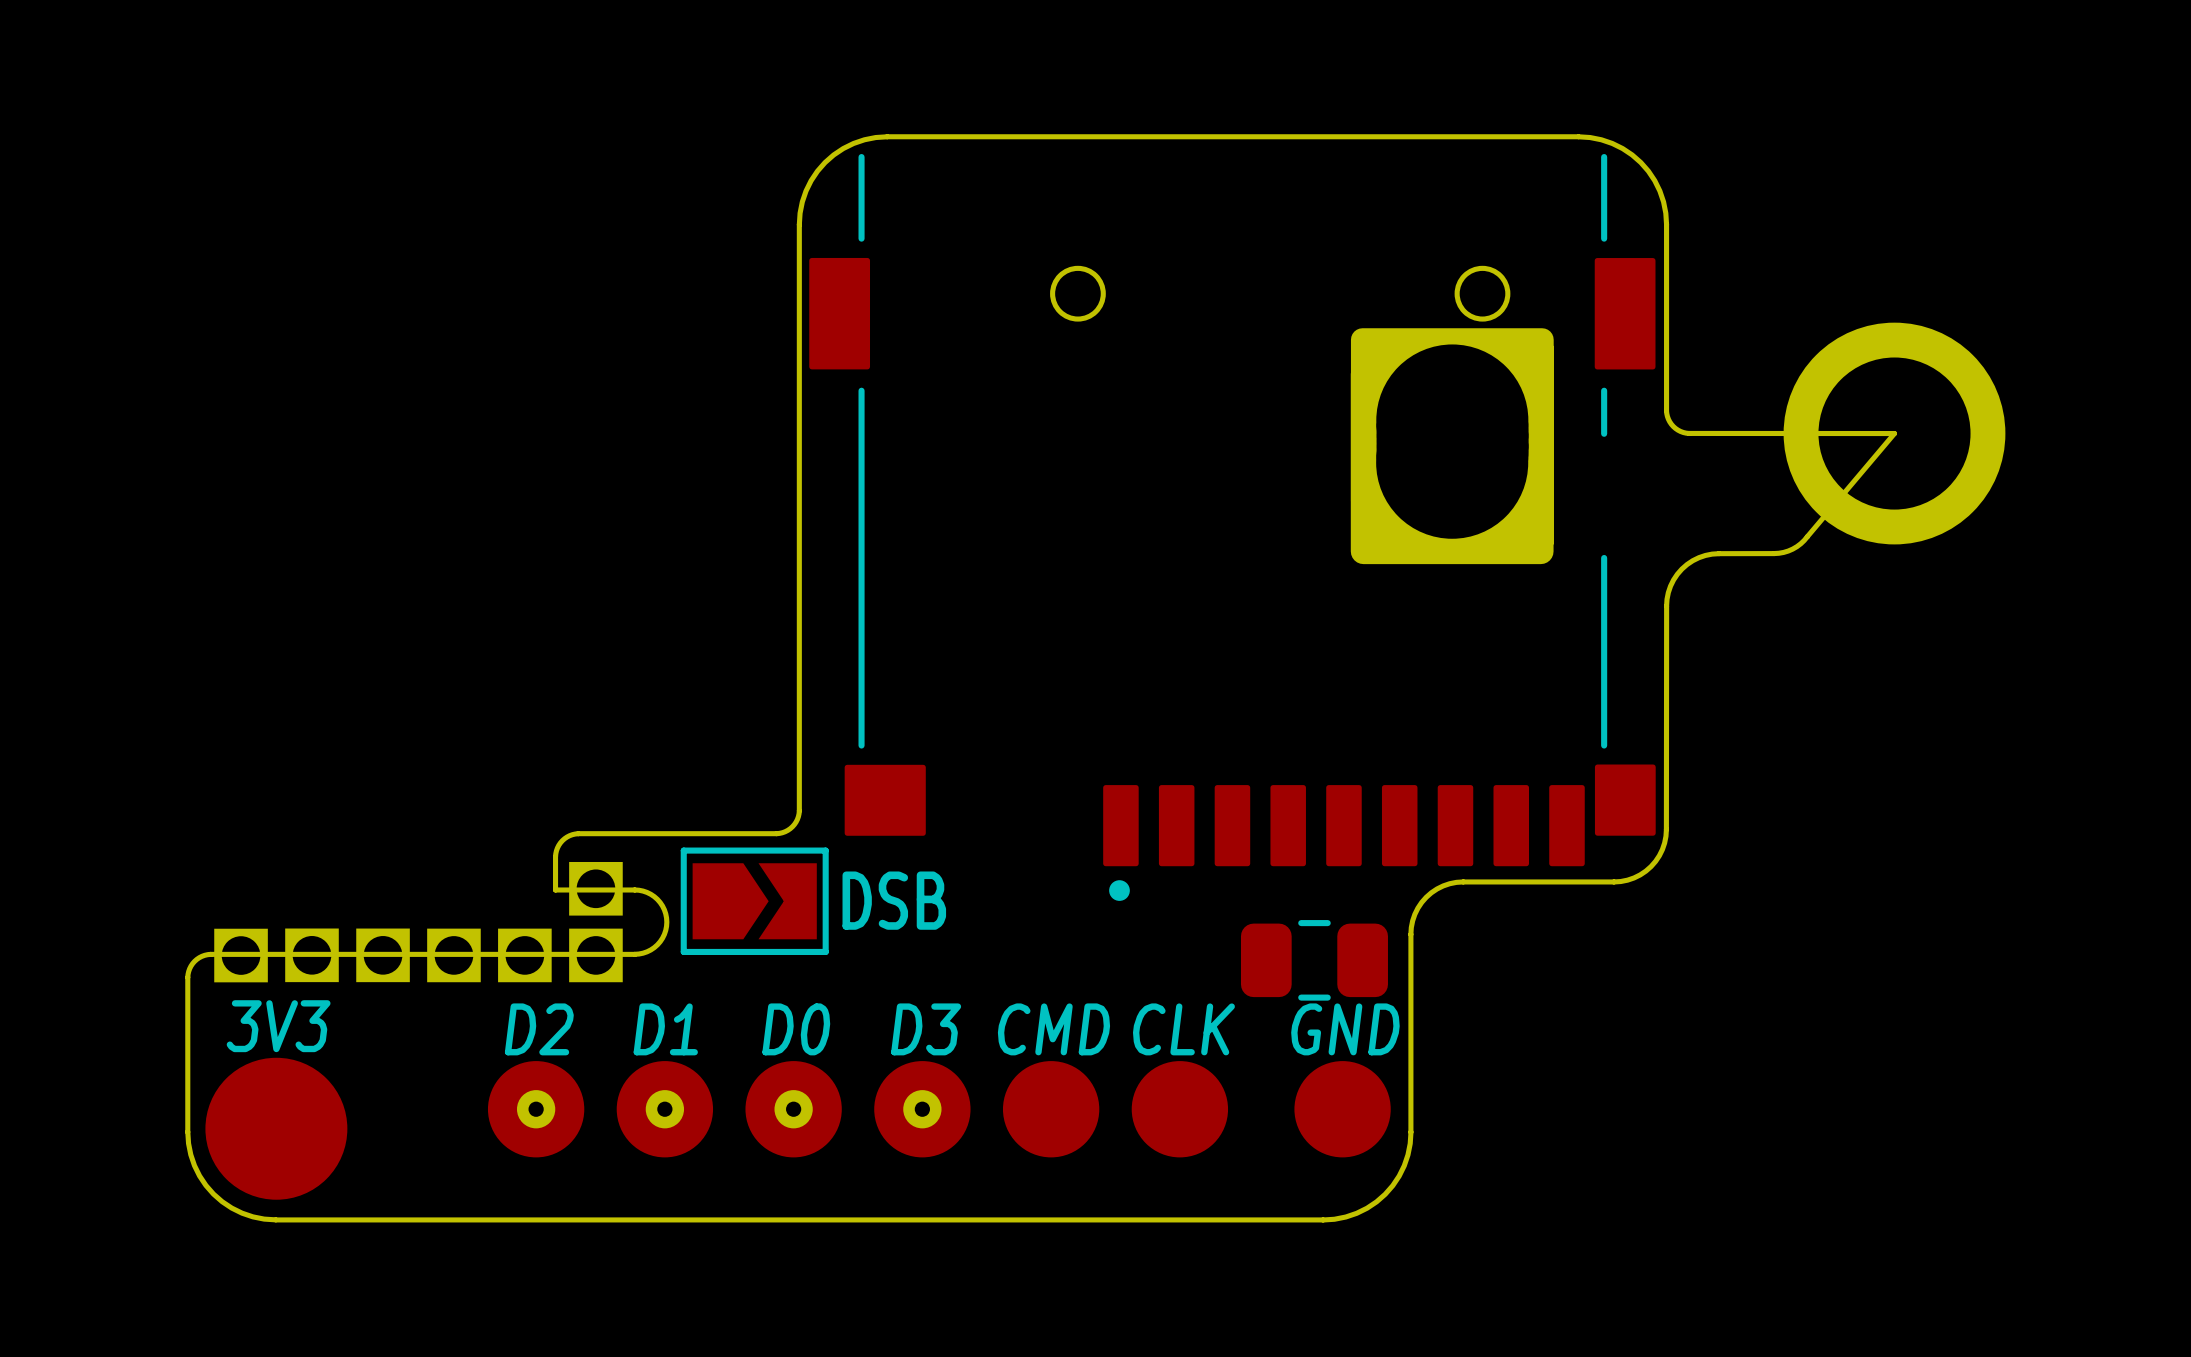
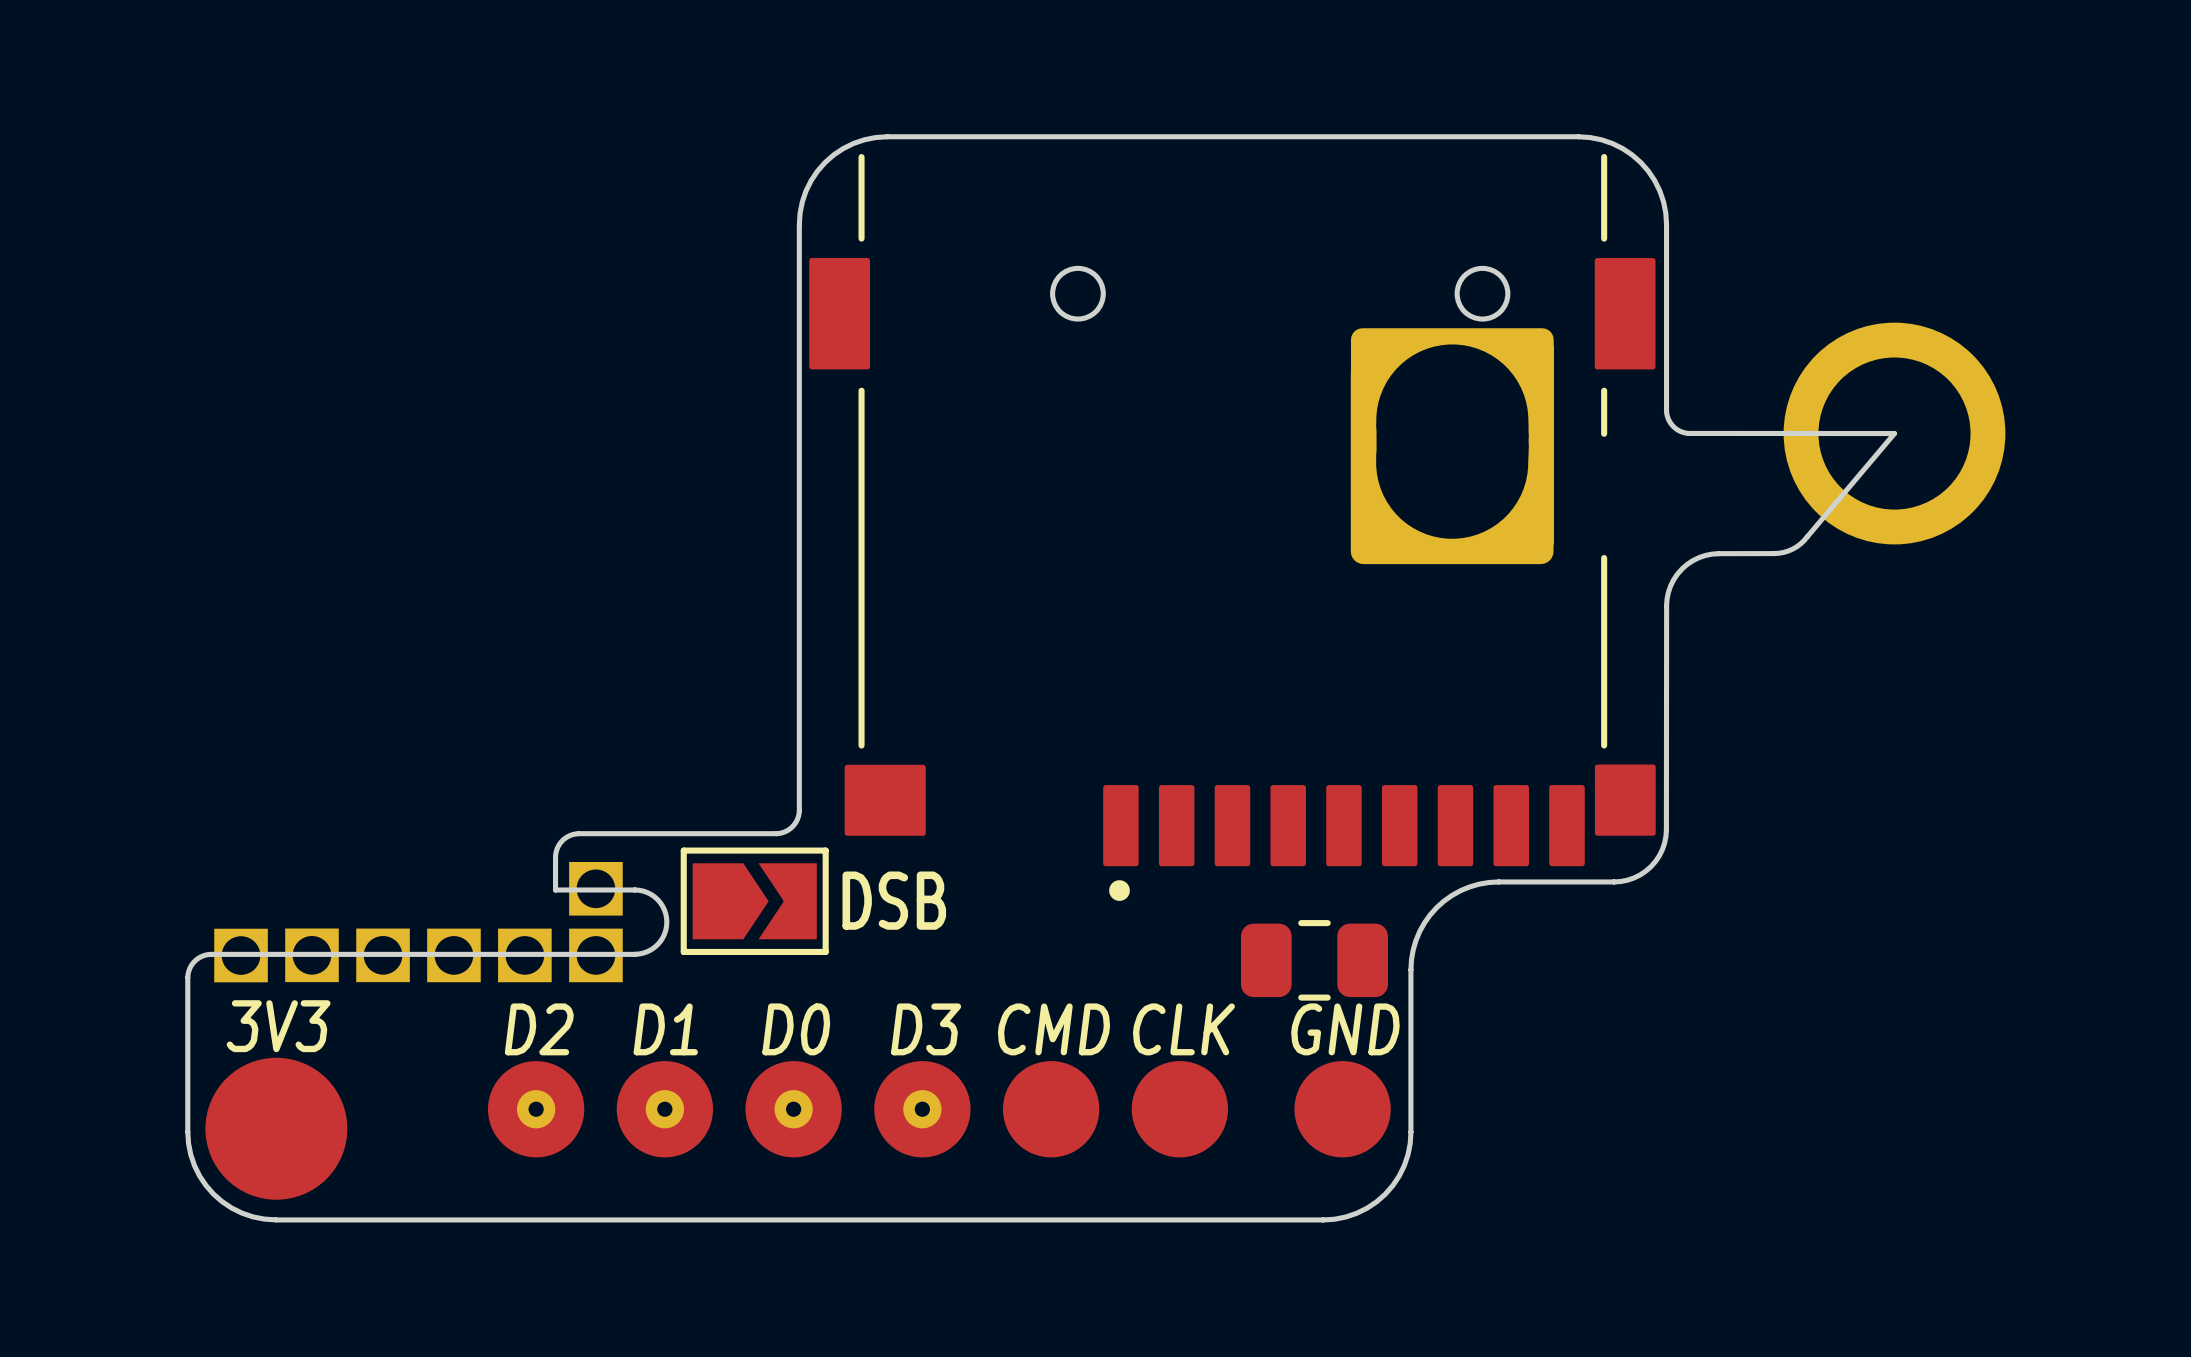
board edge: (1498, 881) (1449, 883) (1437, 888) (1426, 897) (1417, 908) (1412, 920) (1410, 969) -> (1498, 881) (1479, 884) (1460, 890) (1436, 907) (1419, 931) (1413, 950) (1410, 969)

